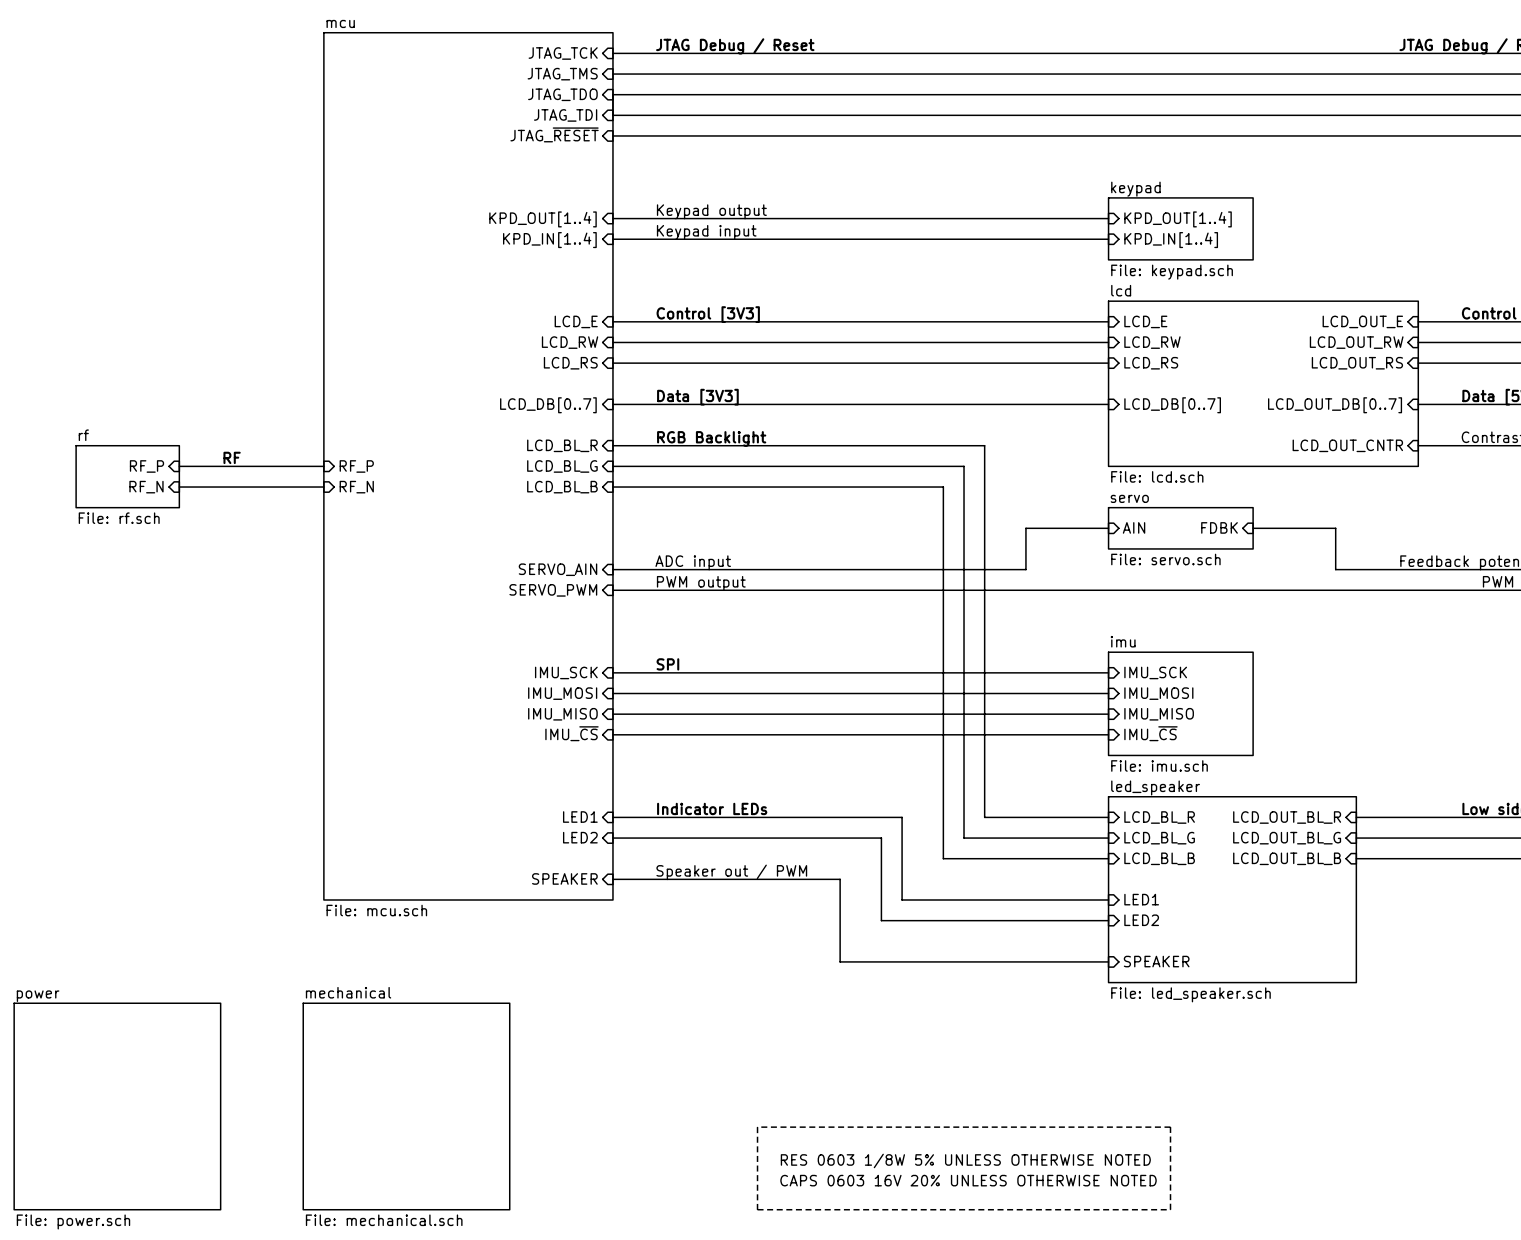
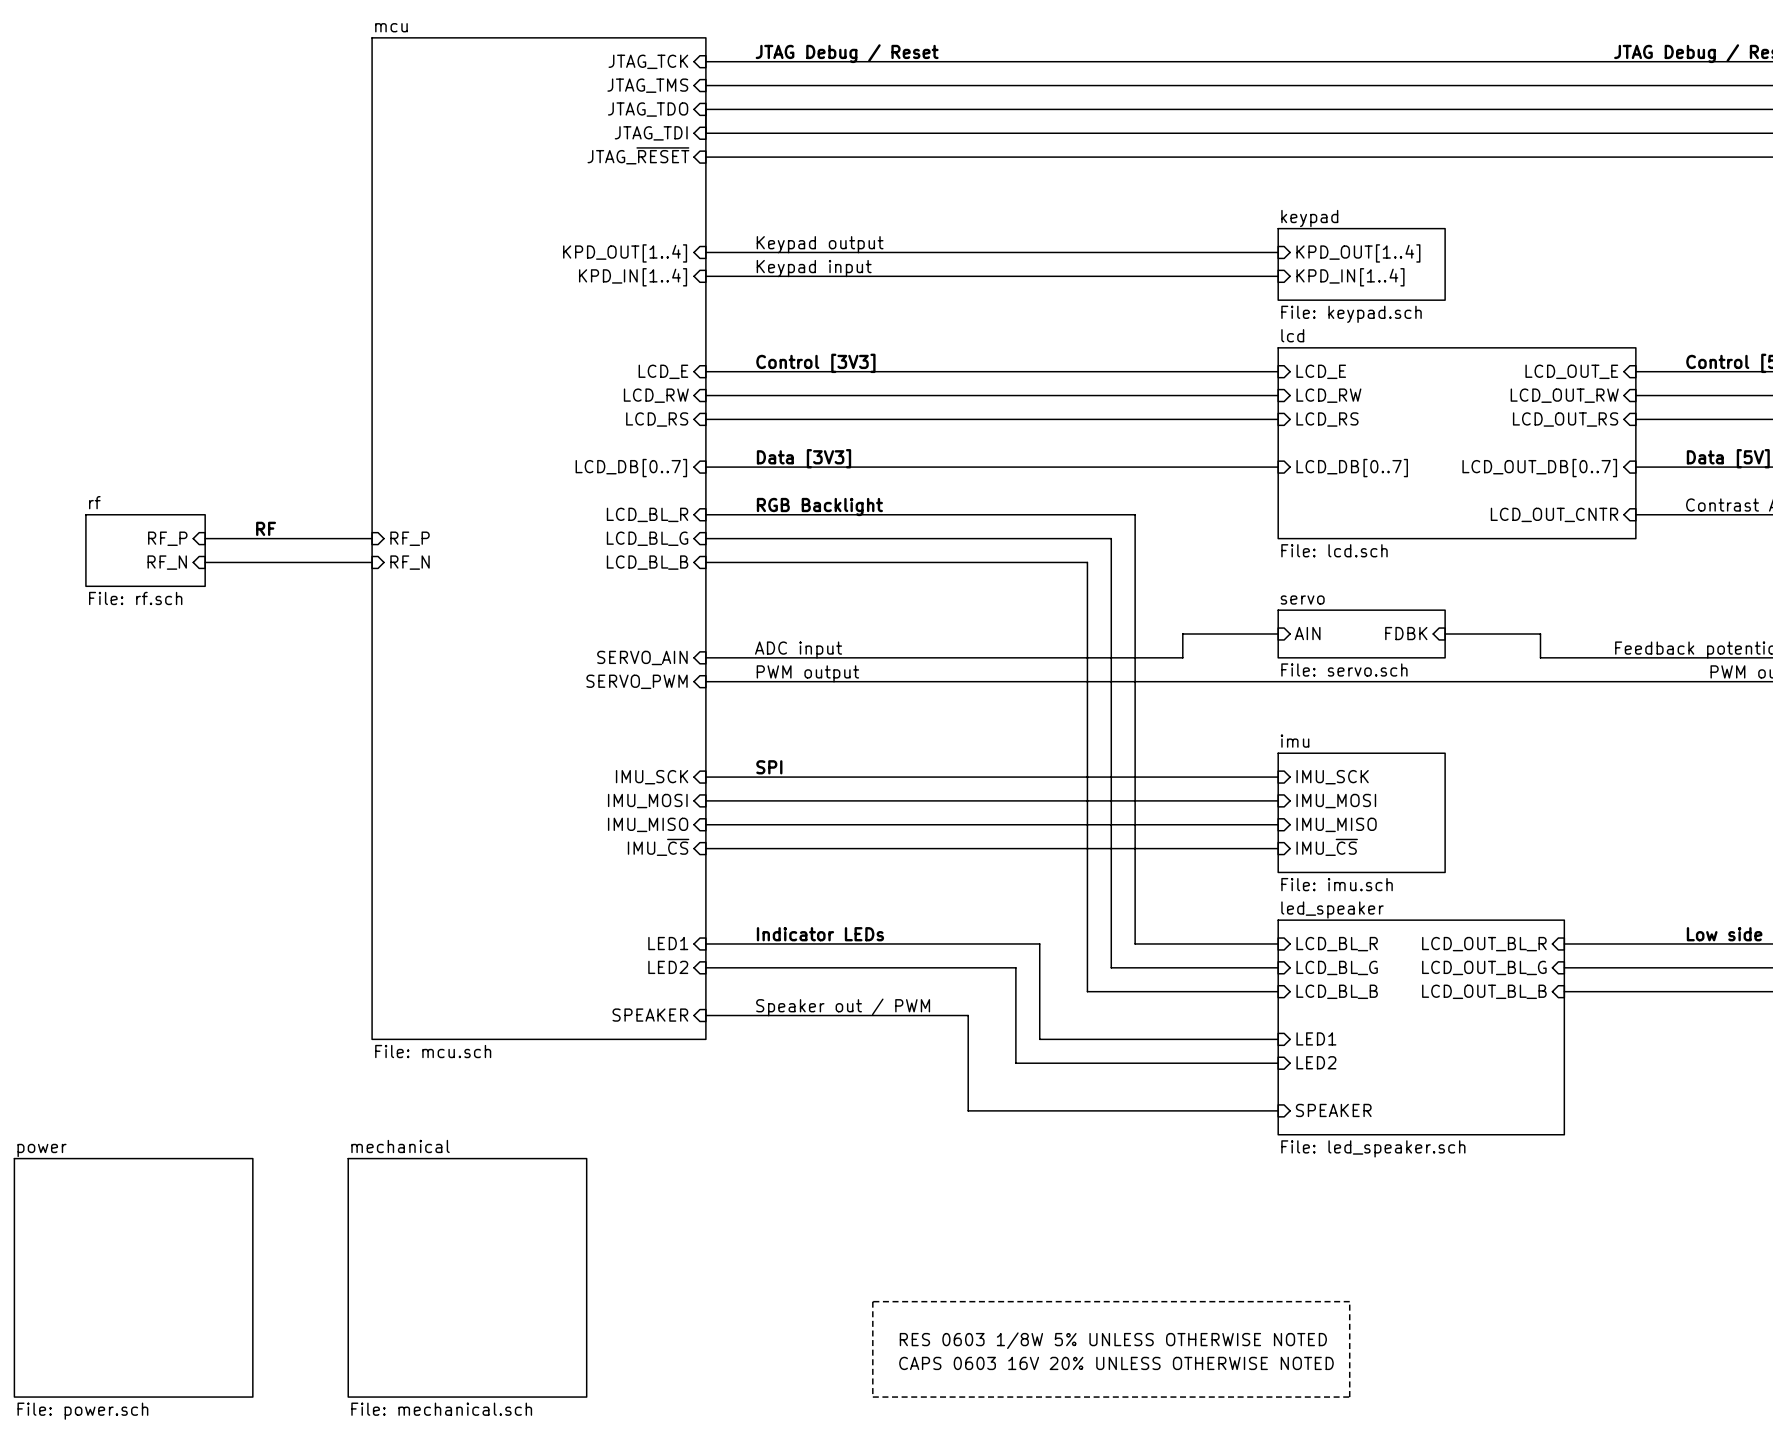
sheet pin position: AIN (1134, 527) -> AIN (1307, 633)
sheet pin position: FDBK (1219, 527) -> FDBK (1406, 633)
wire: (1108, 528) (1025, 528) (1025, 548) -> (1278, 633) (1182, 633)
sheet servo position: (1180, 528) -> (1361, 633)
wire: (1253, 528) (1335, 528) (1335, 548) -> (1445, 633) (1540, 633)

